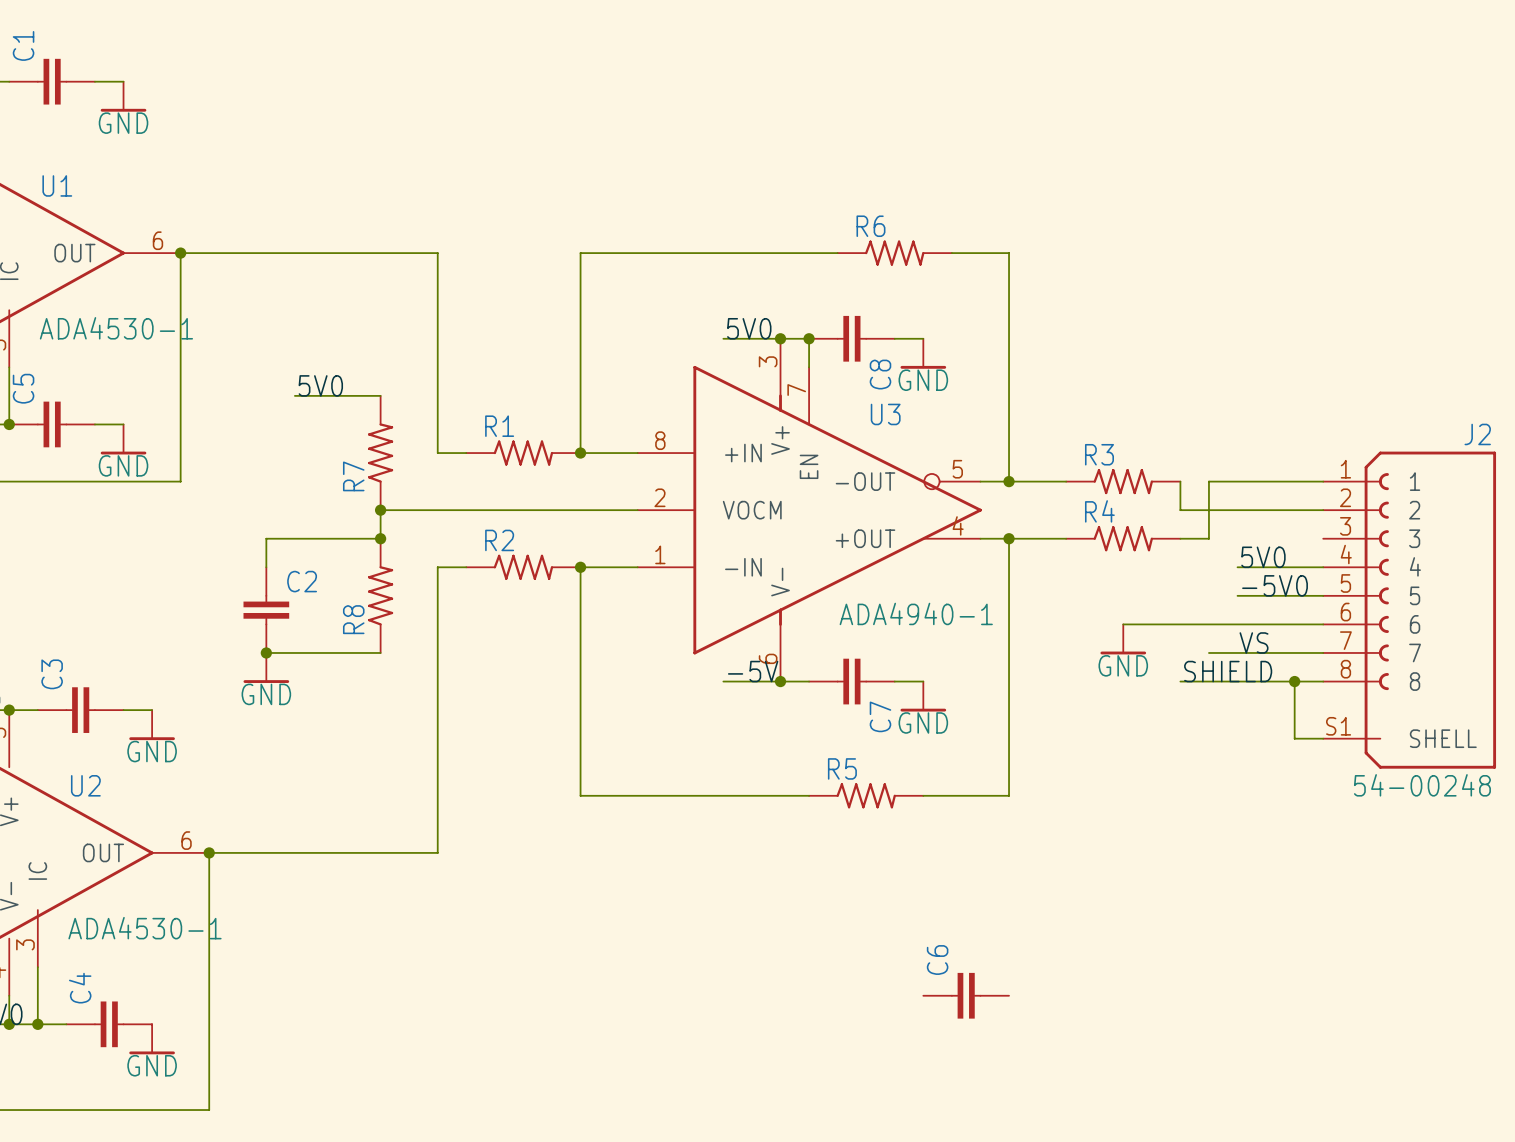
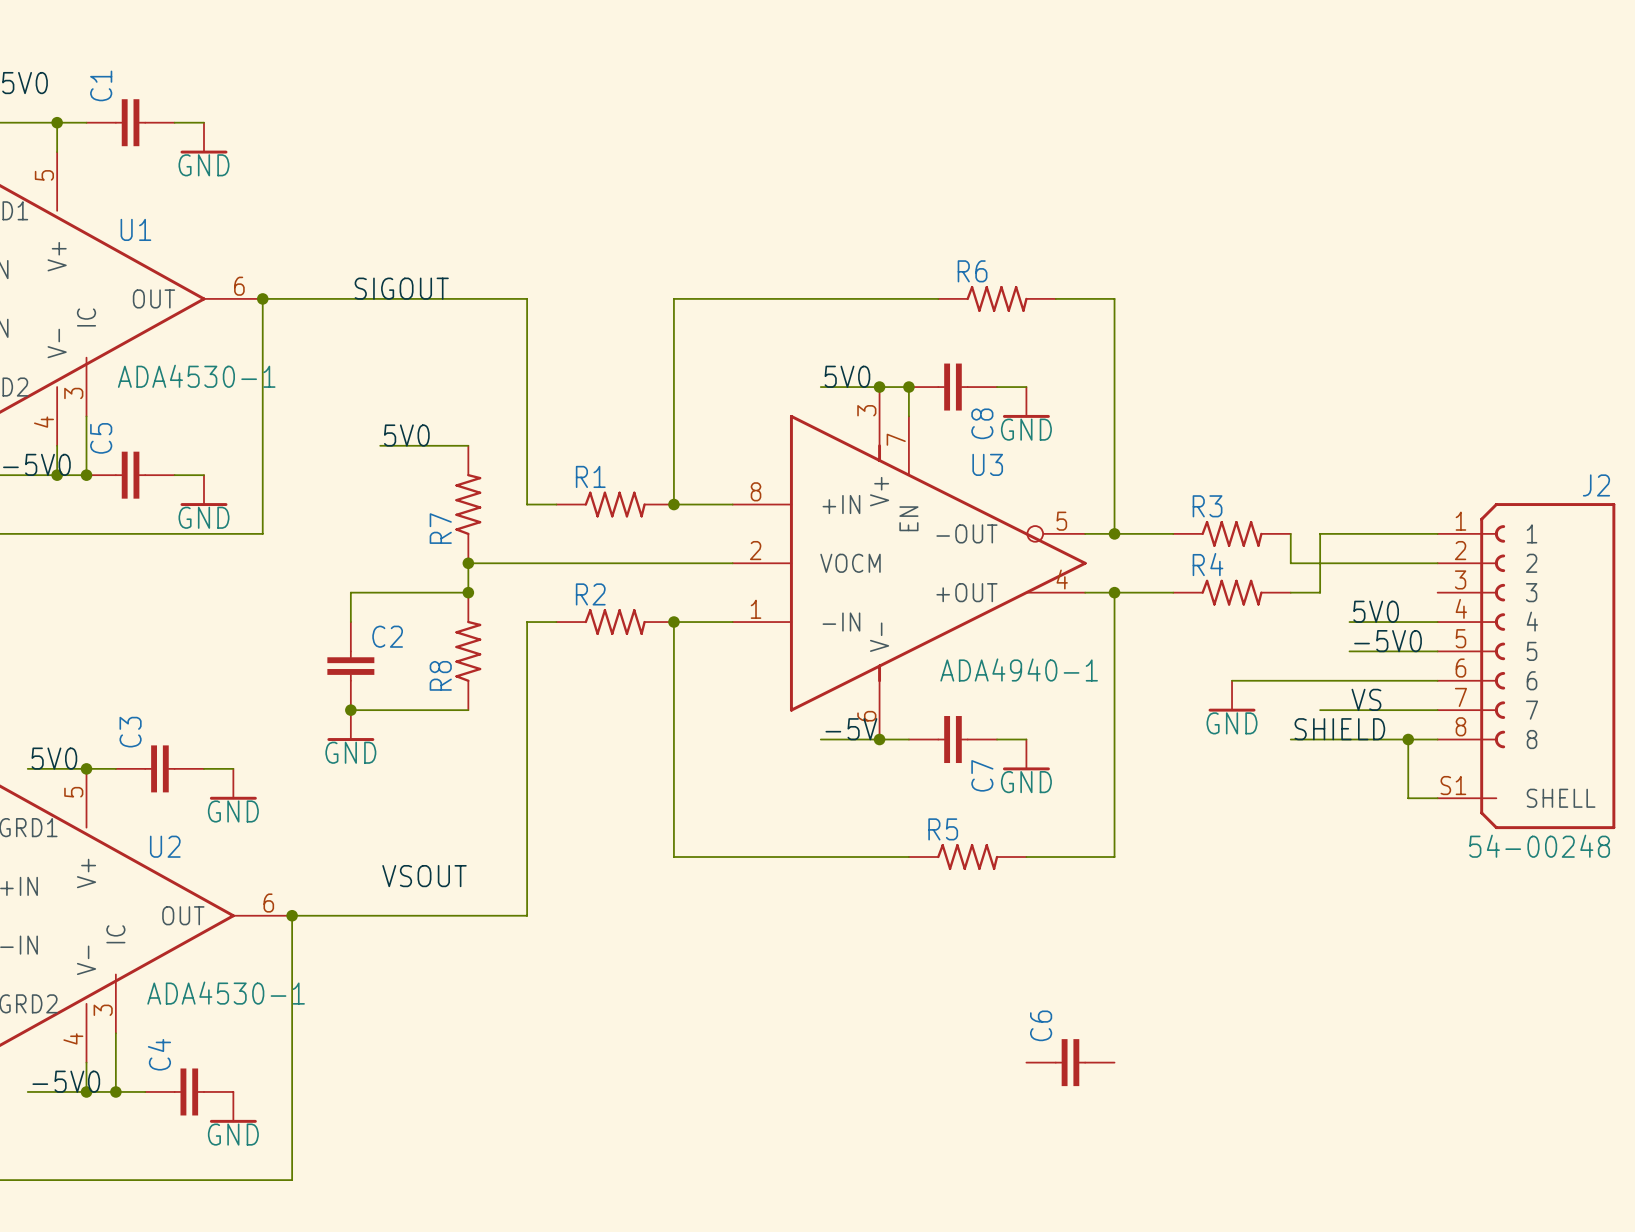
label: none -> SIGOUT (401, 288)
label: none -> VSOUT (424, 876)

